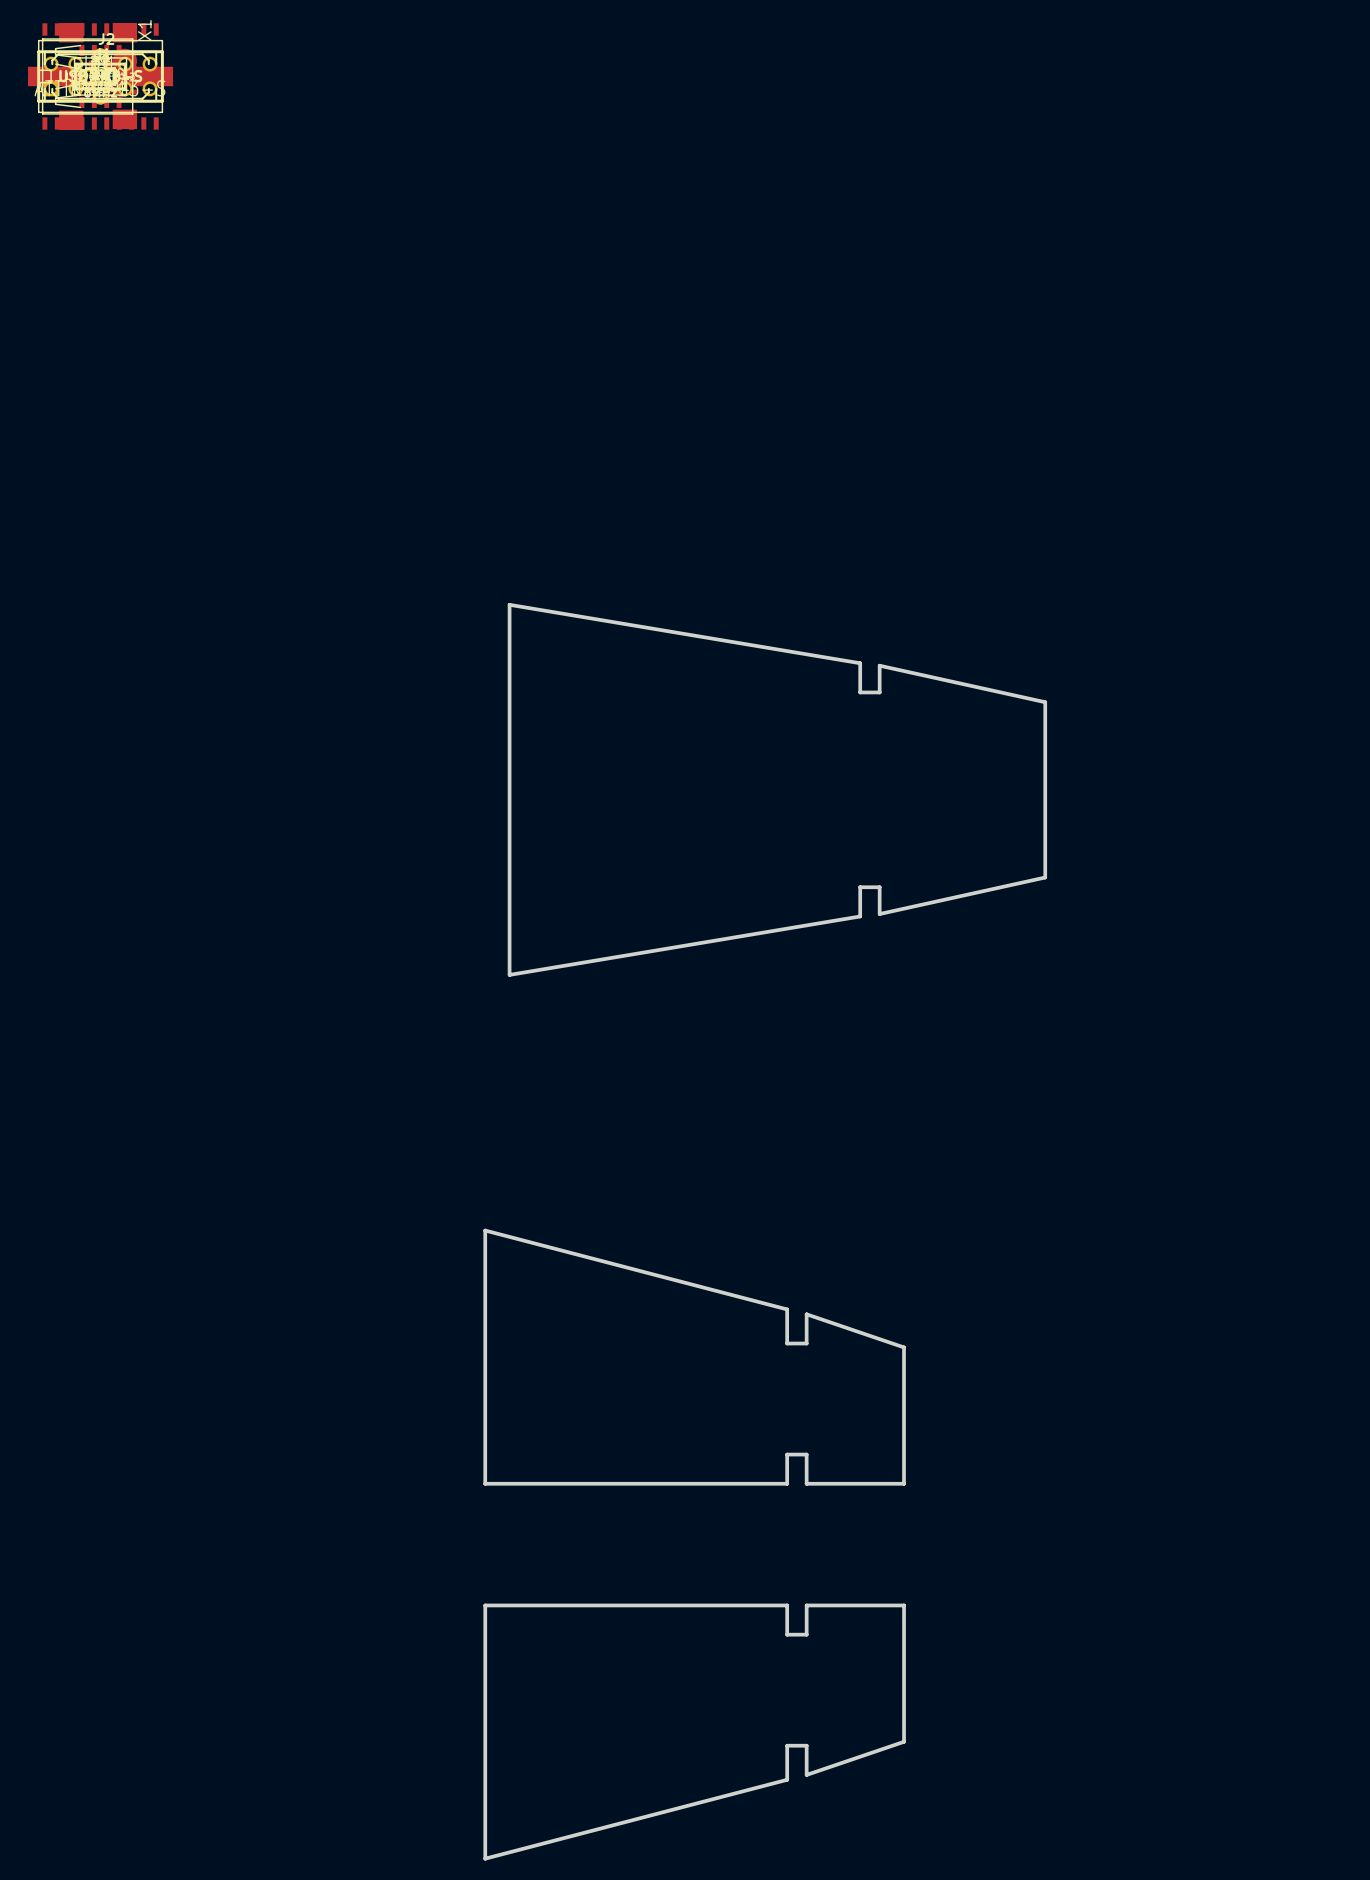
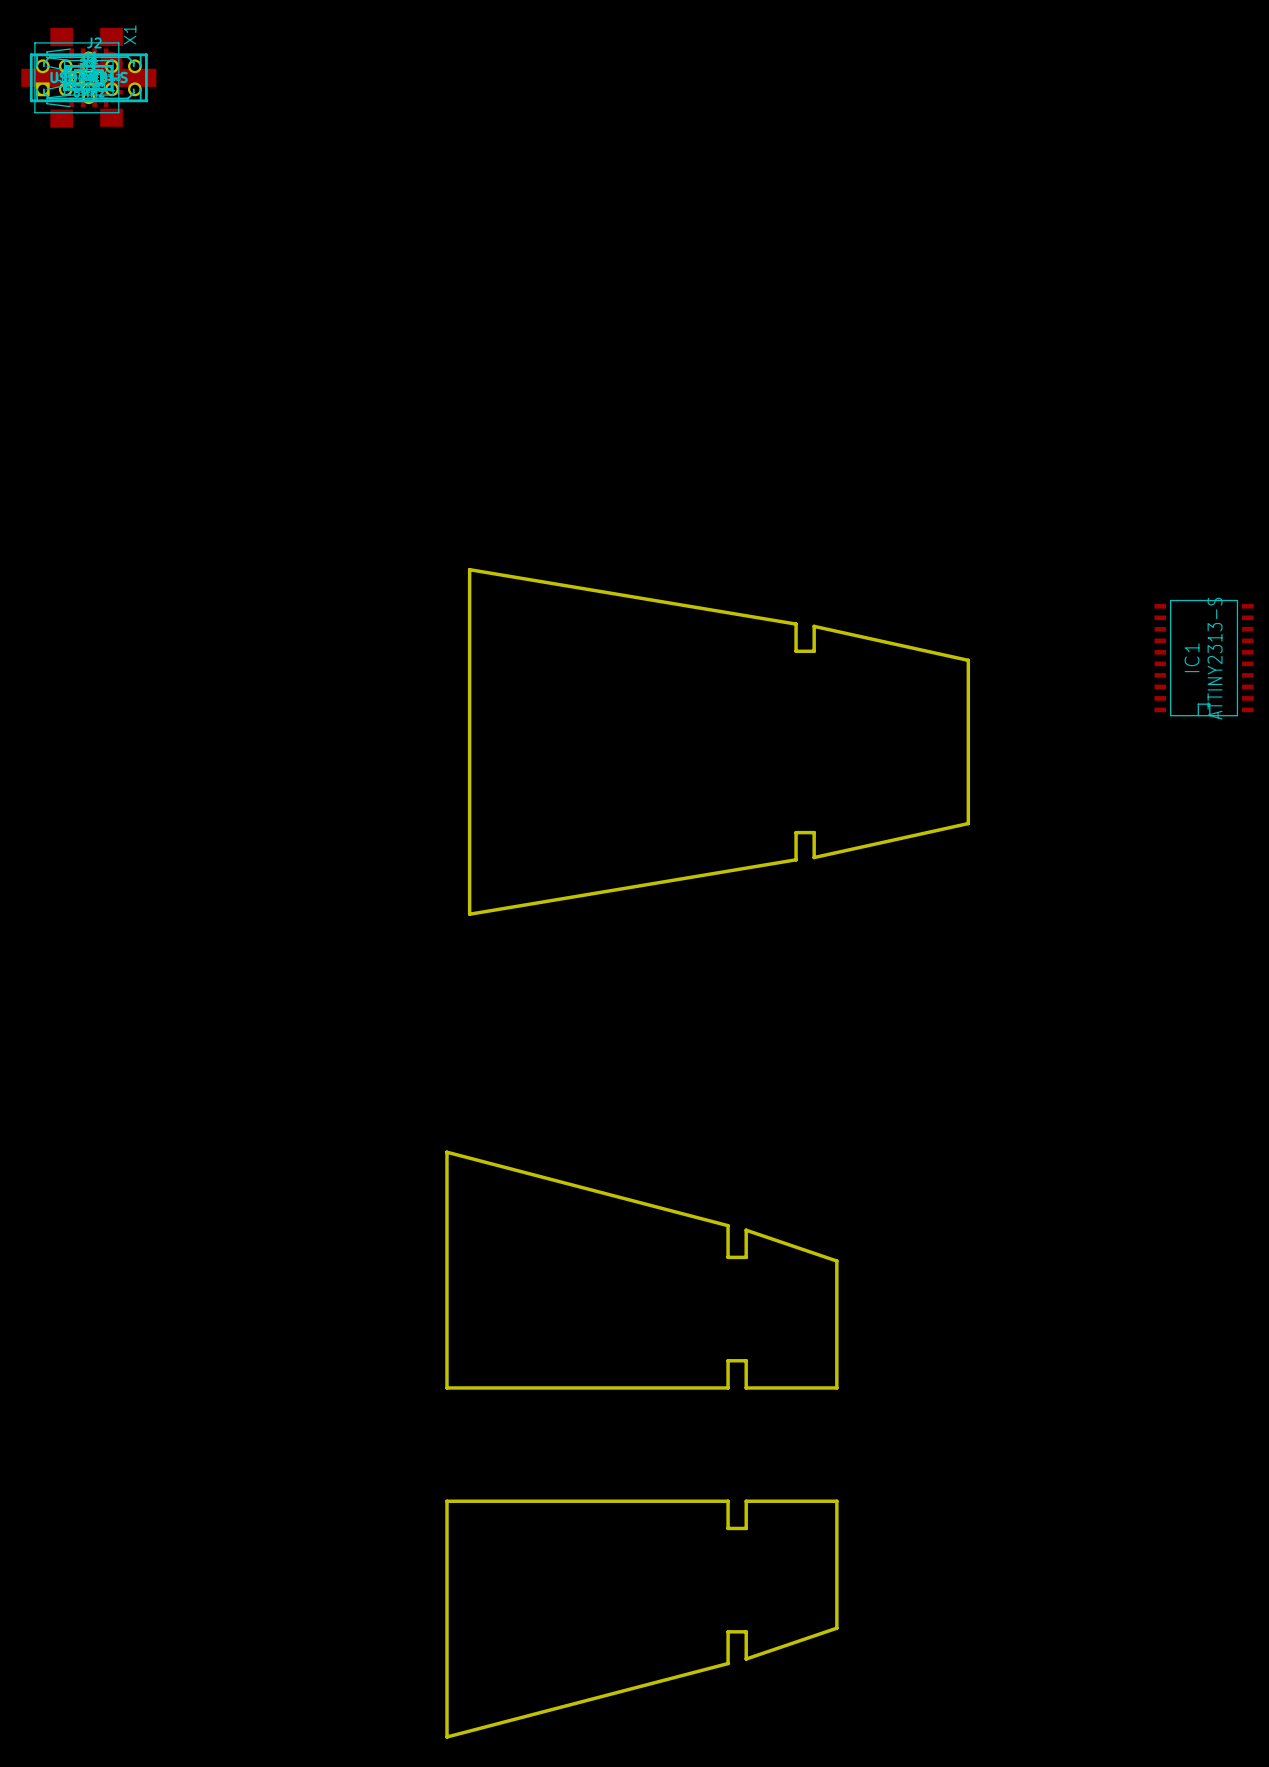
IC1 rotation: 0° (100, 76) -> 90° counterclockwise (1204, 658)
IC1 position: (100, 76) -> (1204, 658)

